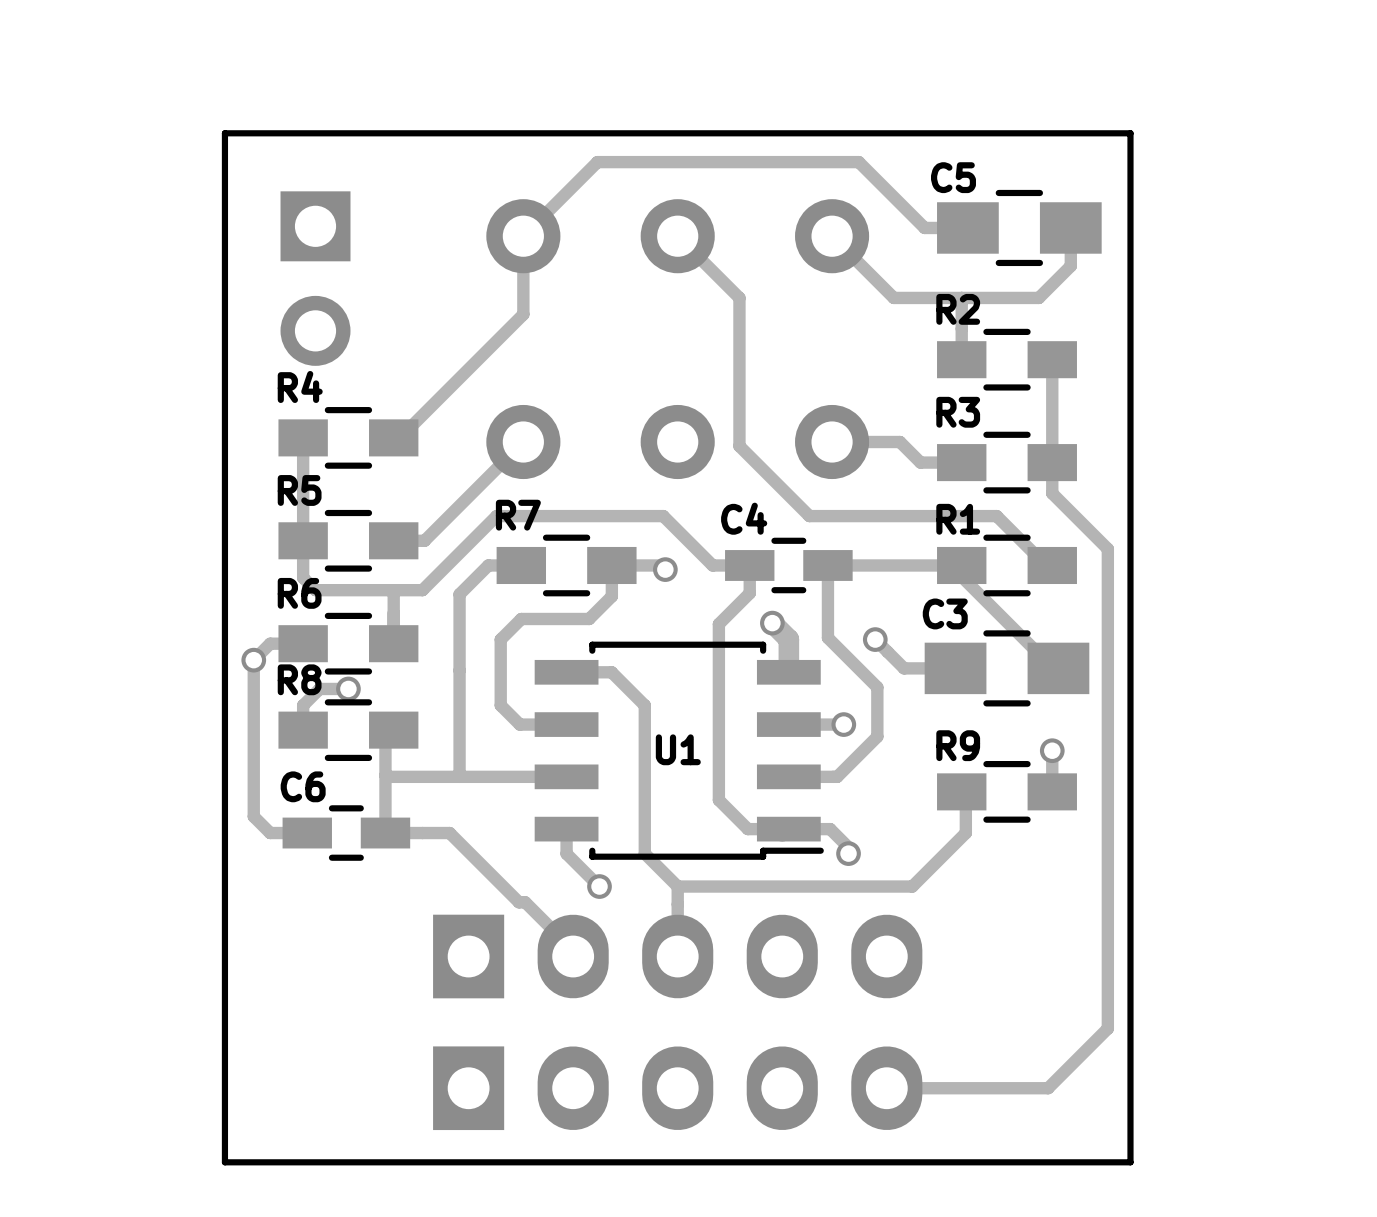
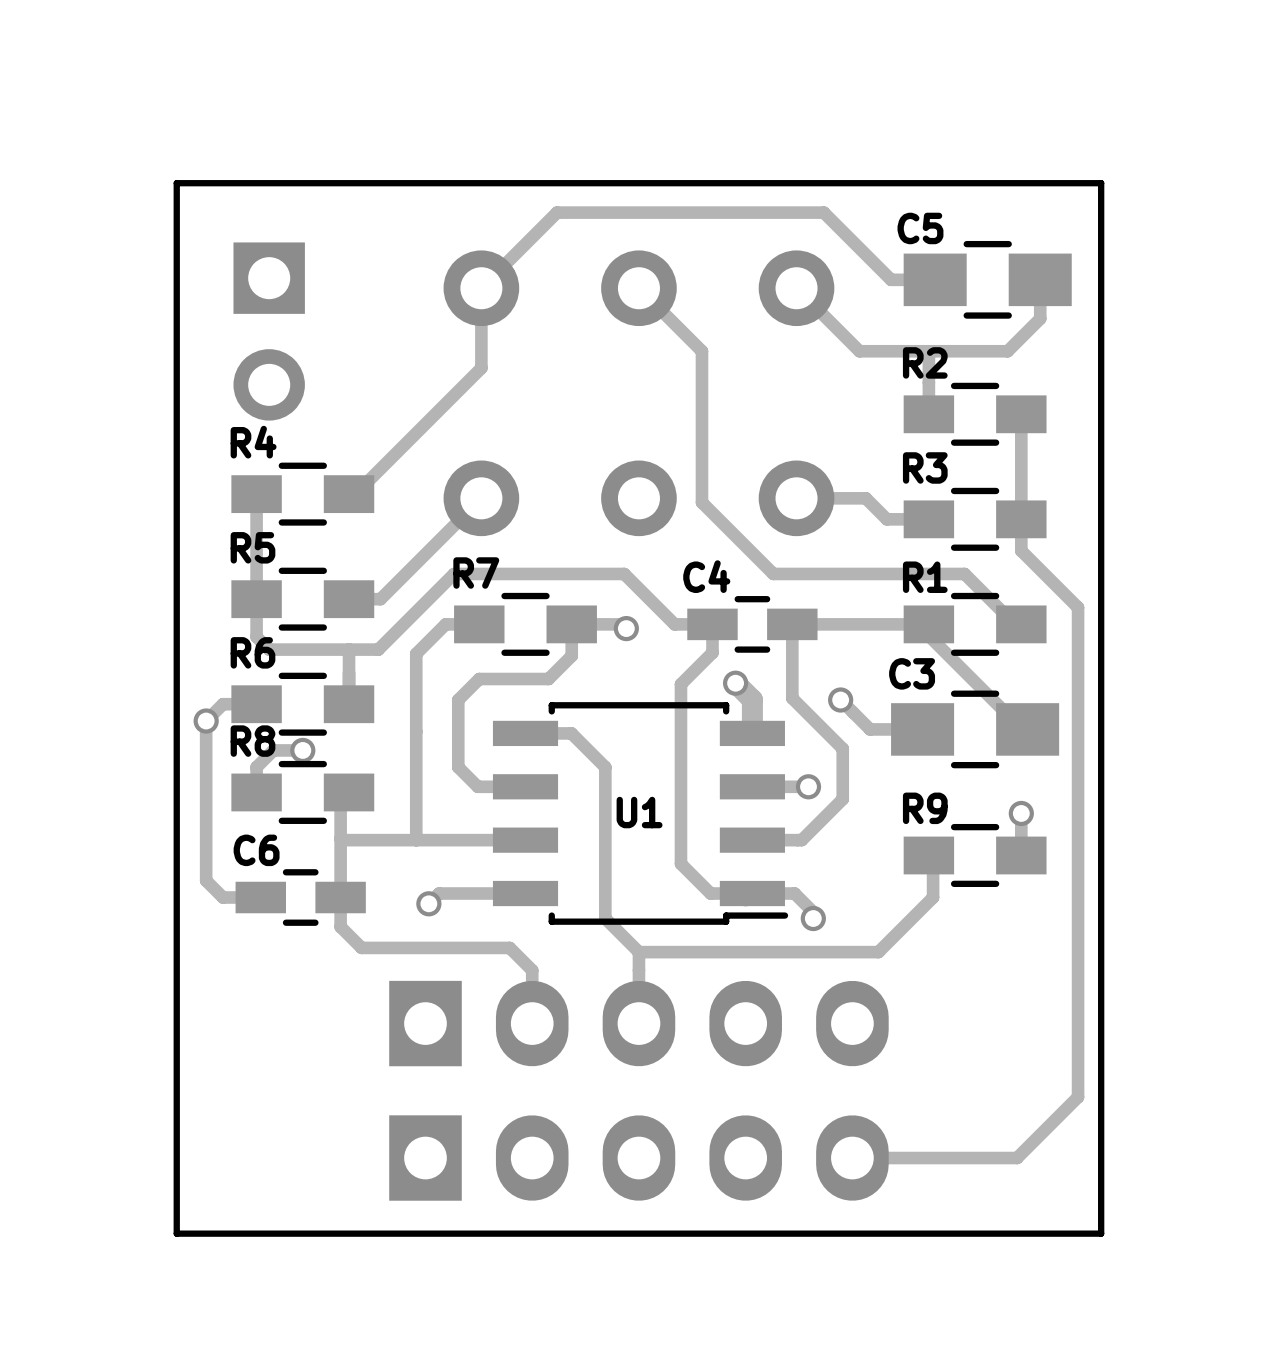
track: (566, 829) (566, 853) (599, 886) -> (525, 893) (439, 893) (428, 903)
track: (385, 833) (449, 833) (519, 902) (525, 902) (573, 950) -> (340, 897) (340, 926) (361, 947) (509, 947) (532, 970) (532, 1017)
via position: (599, 886) -> (428, 903)

